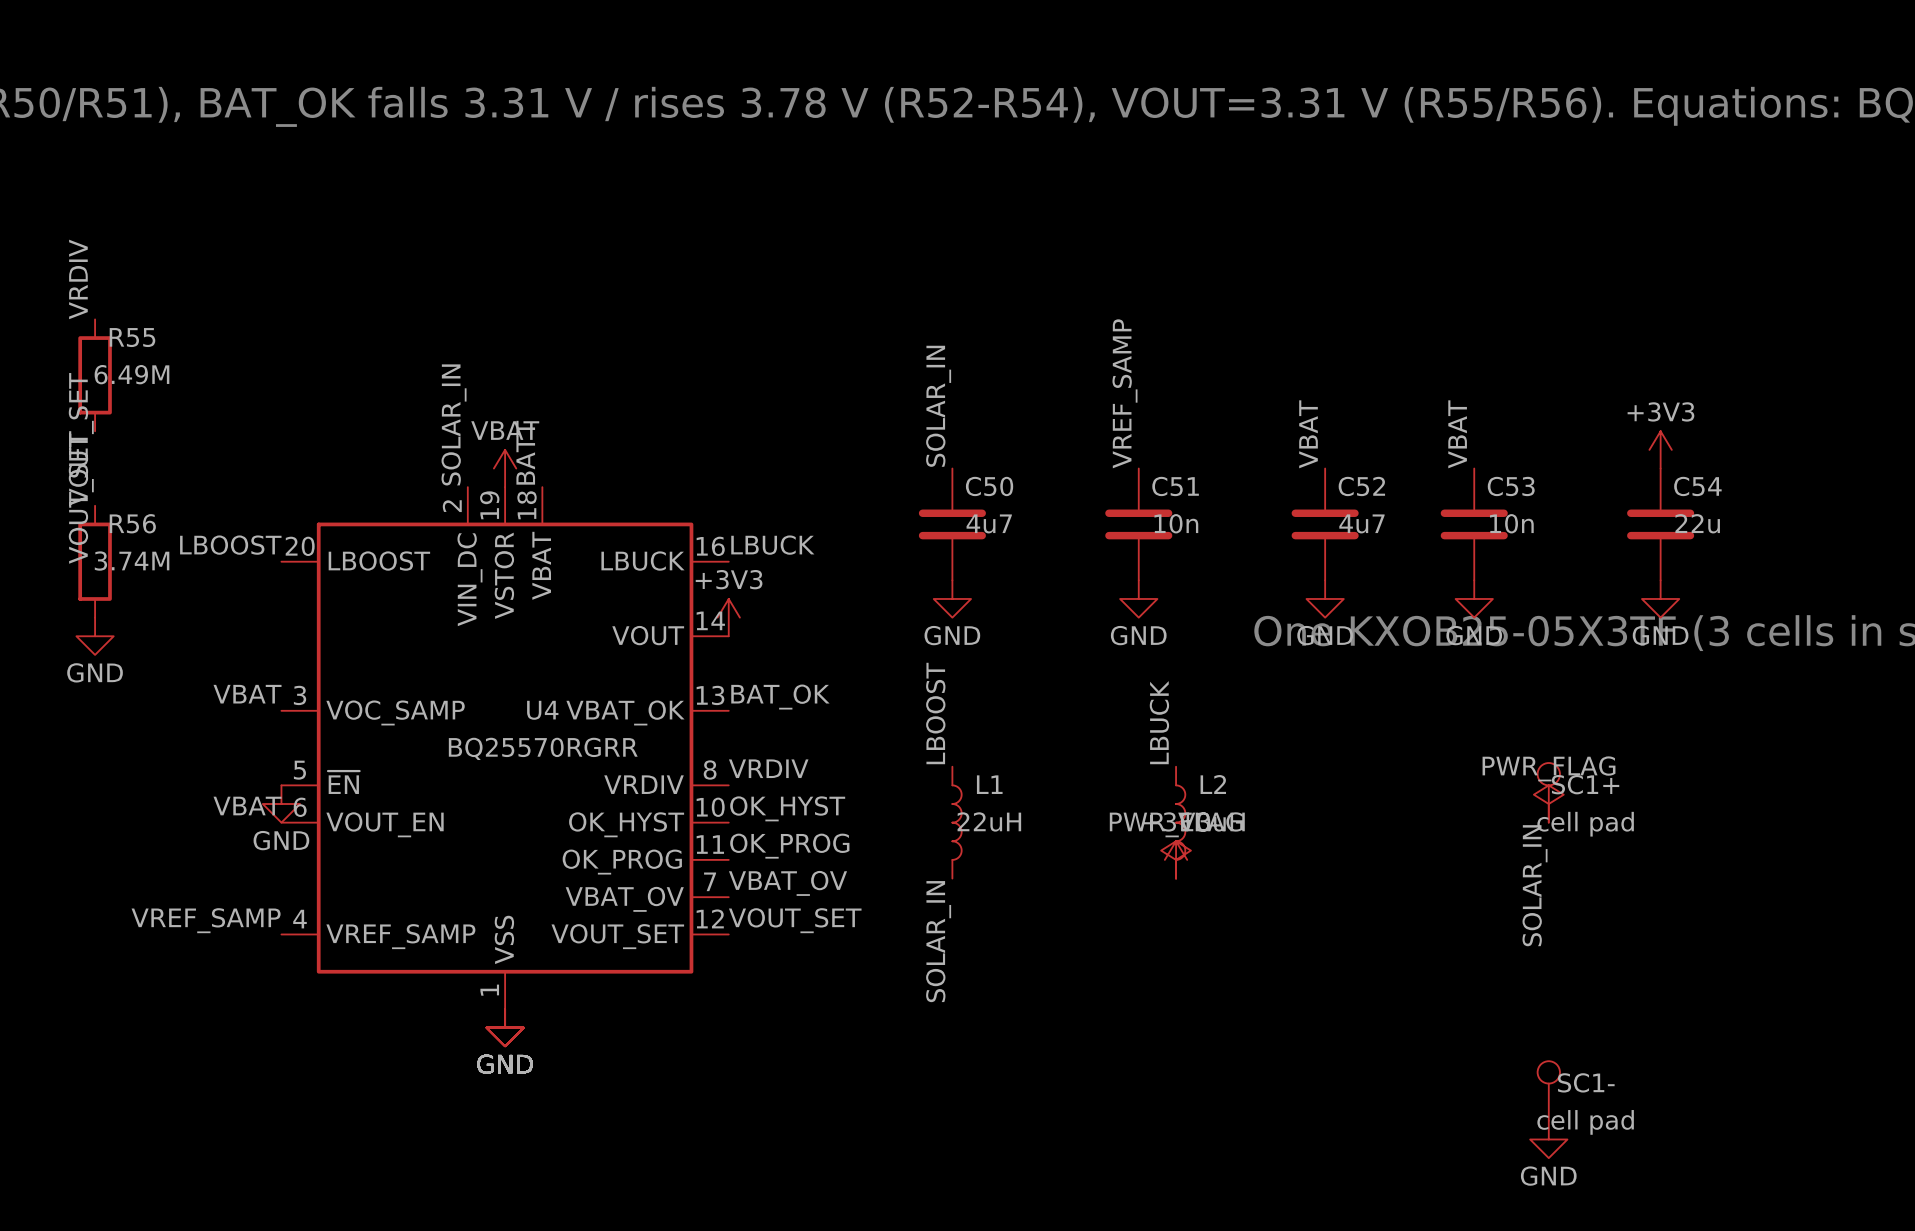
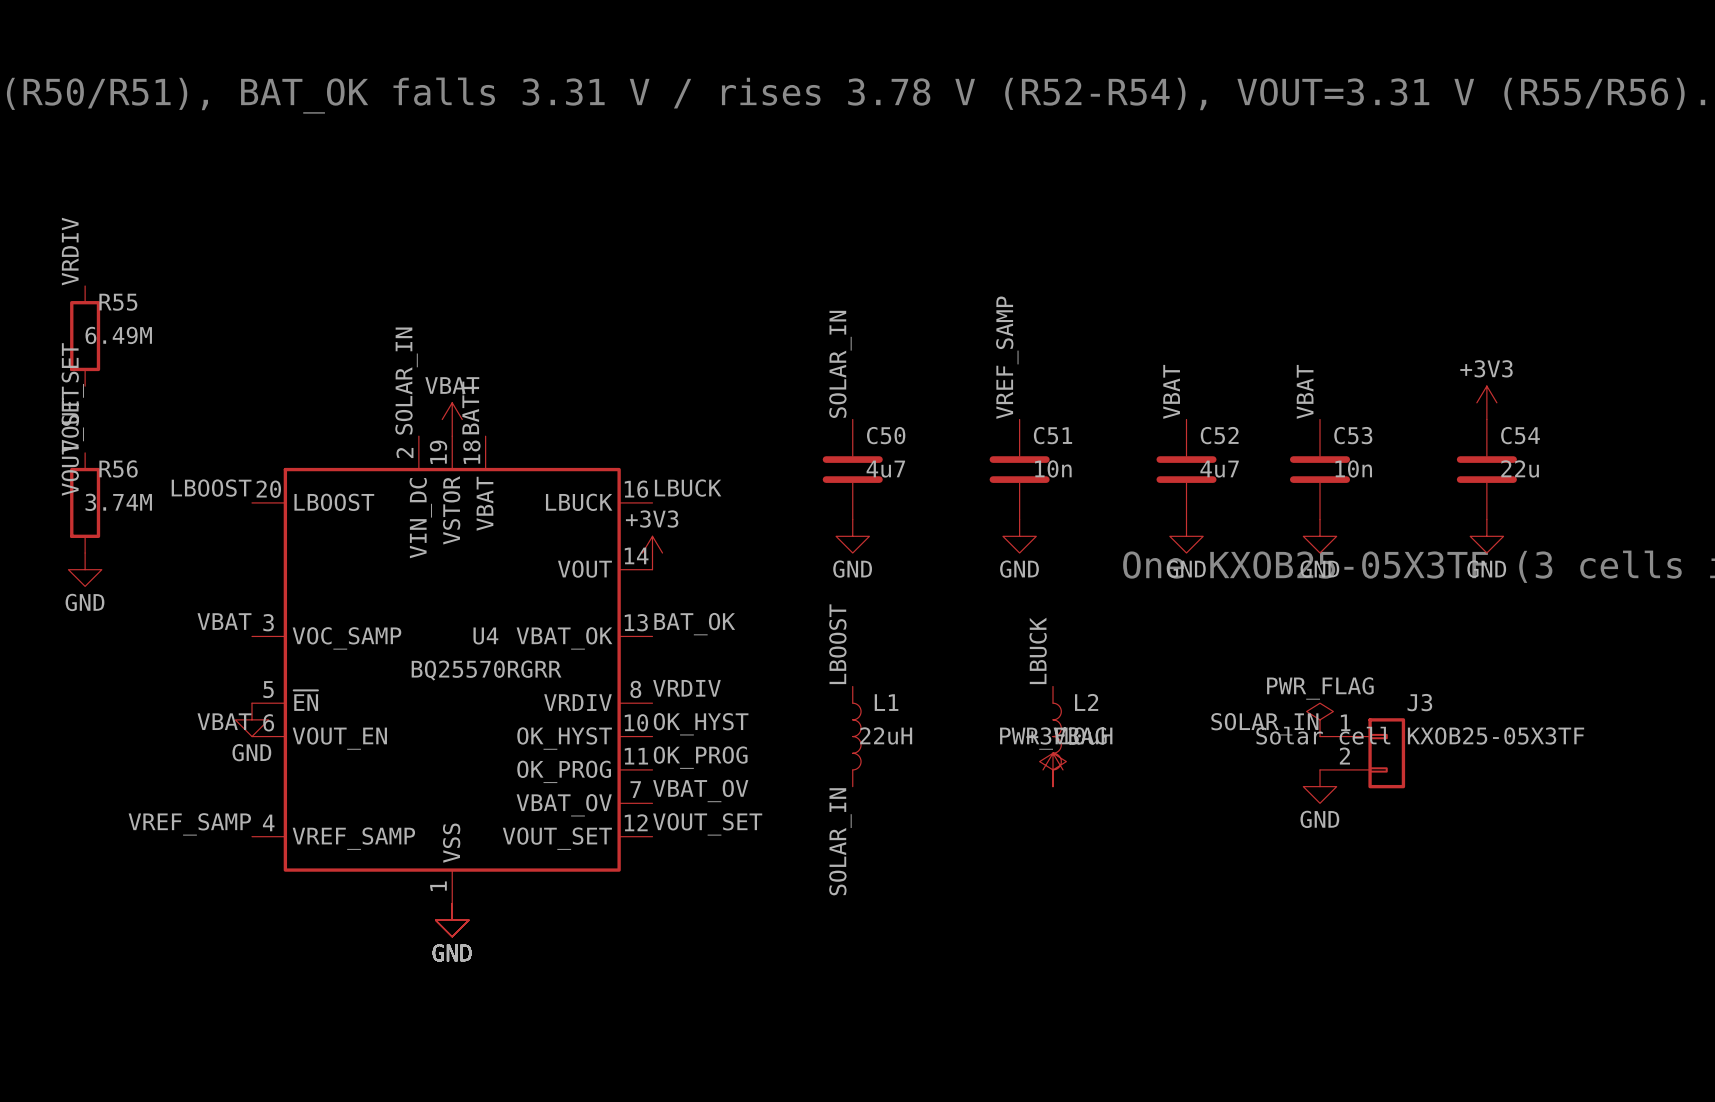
SC1+: cell pad (1548, 792) -> none
power symbol position: PWR_FLAG (1548, 804) -> PWR_FLAG (1320, 719)
J3: none -> Solar cell KXOB25-05X3TF (1362, 753)
label rotation: 0° (1535, 885) -> 90° clockwise (1264, 724)
label position: SOLAR_IN (1535, 885) -> SOLAR_IN (1264, 724)
SC1-: cell pad (1548, 1091) -> none
power symbol position: GND (1548, 1139) -> GND (1320, 786)

